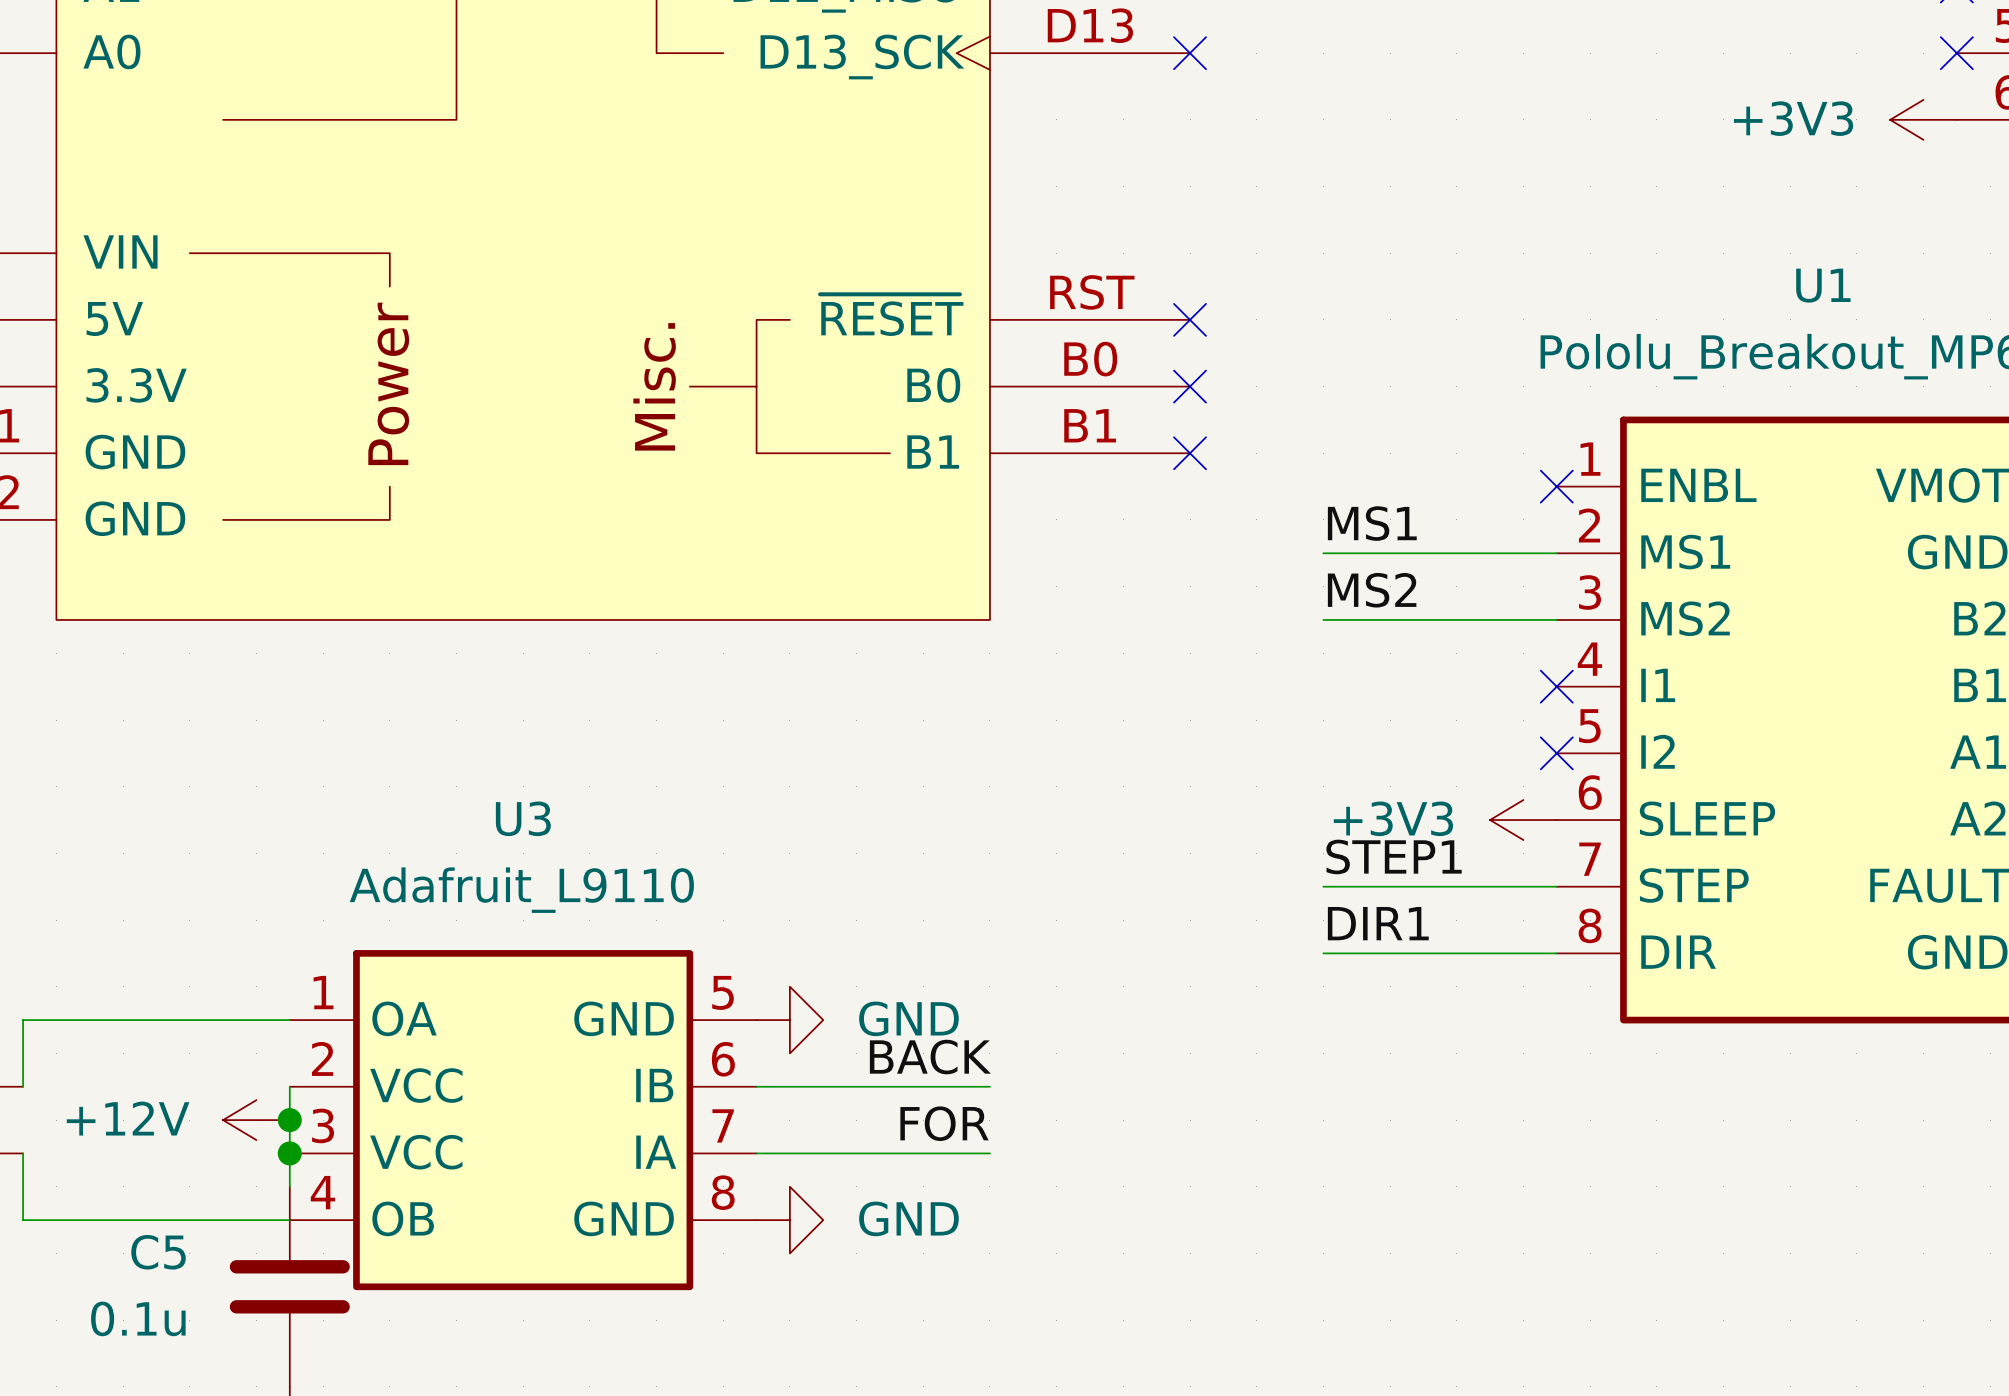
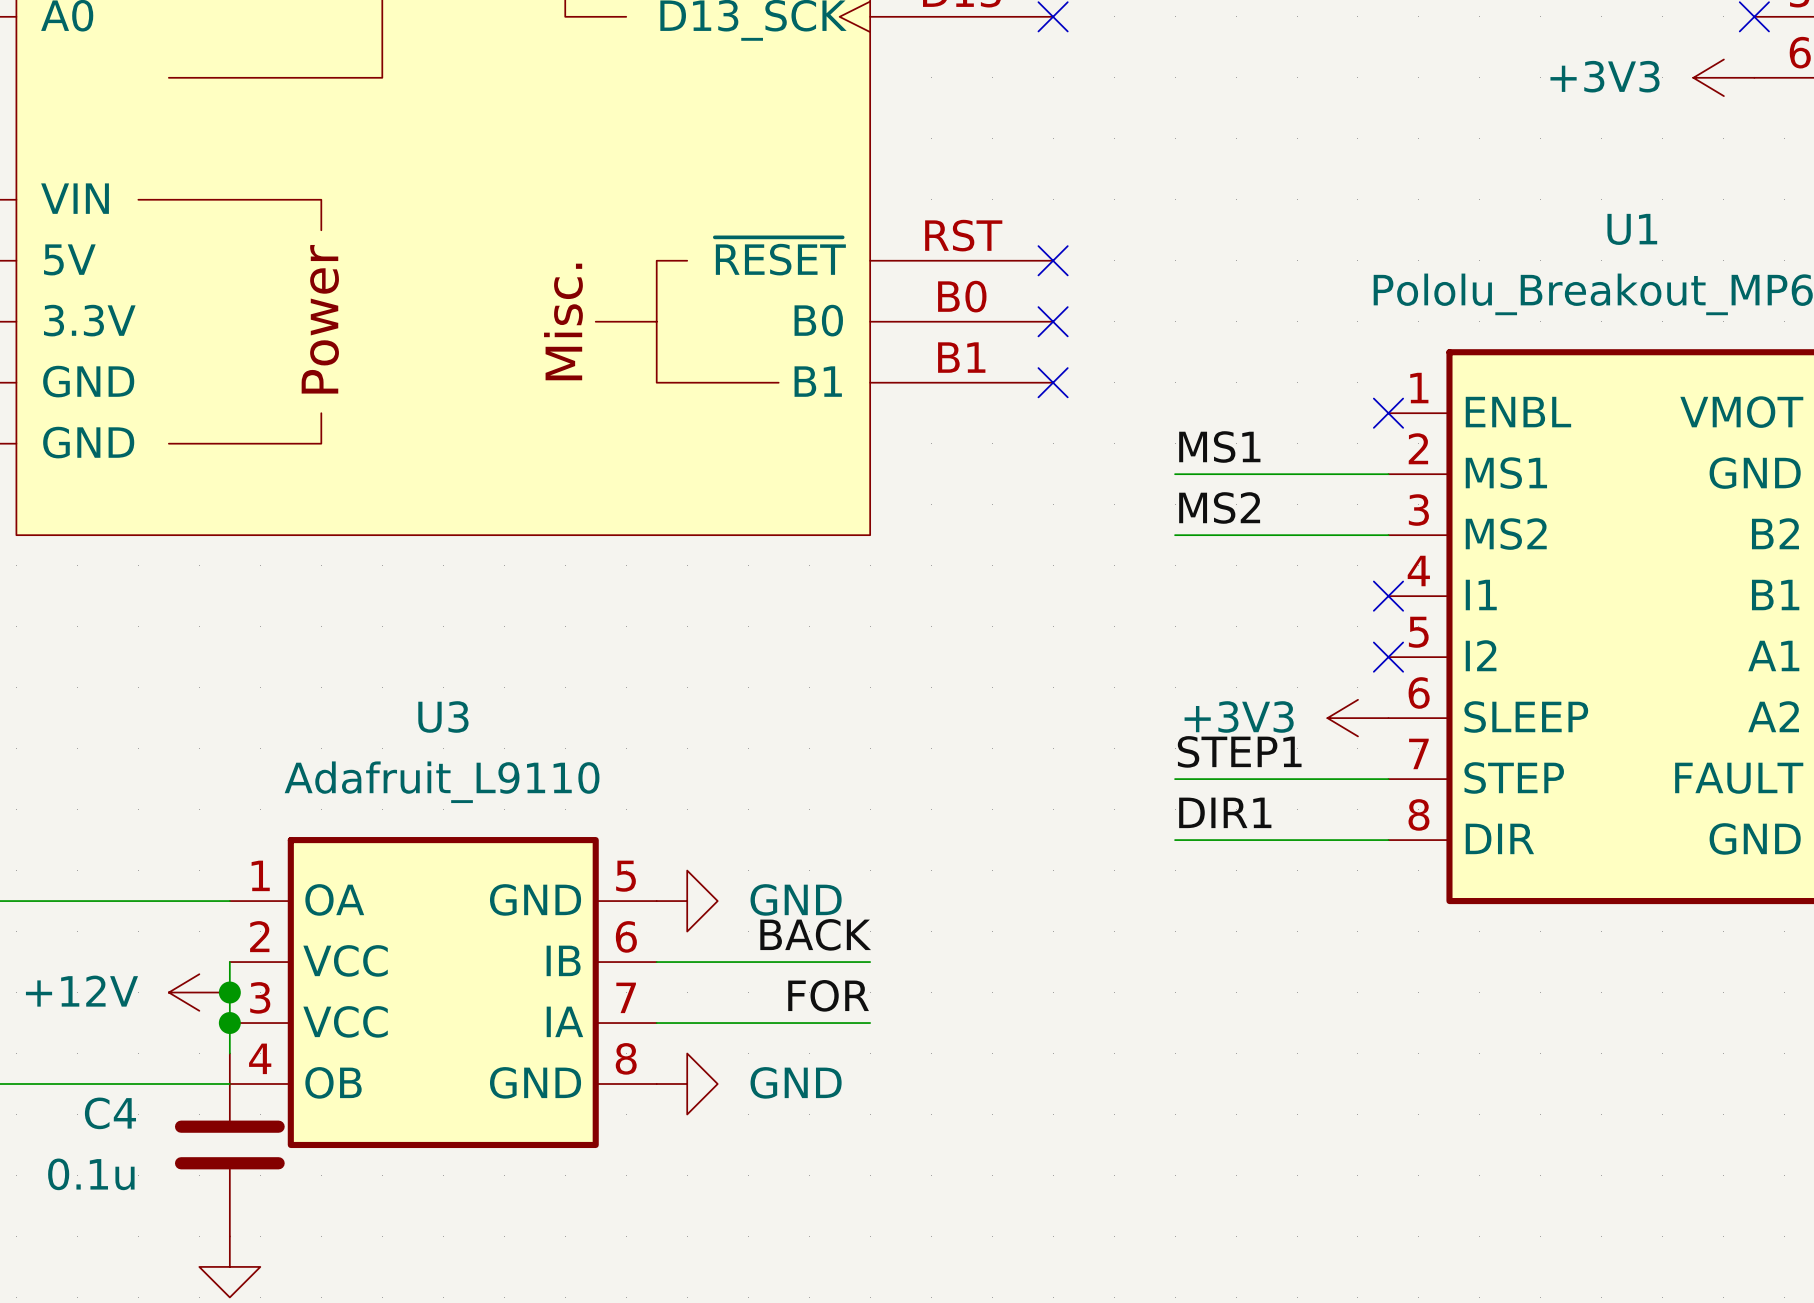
C5 name: C5 (158, 1252) -> C4 (110, 1113)

